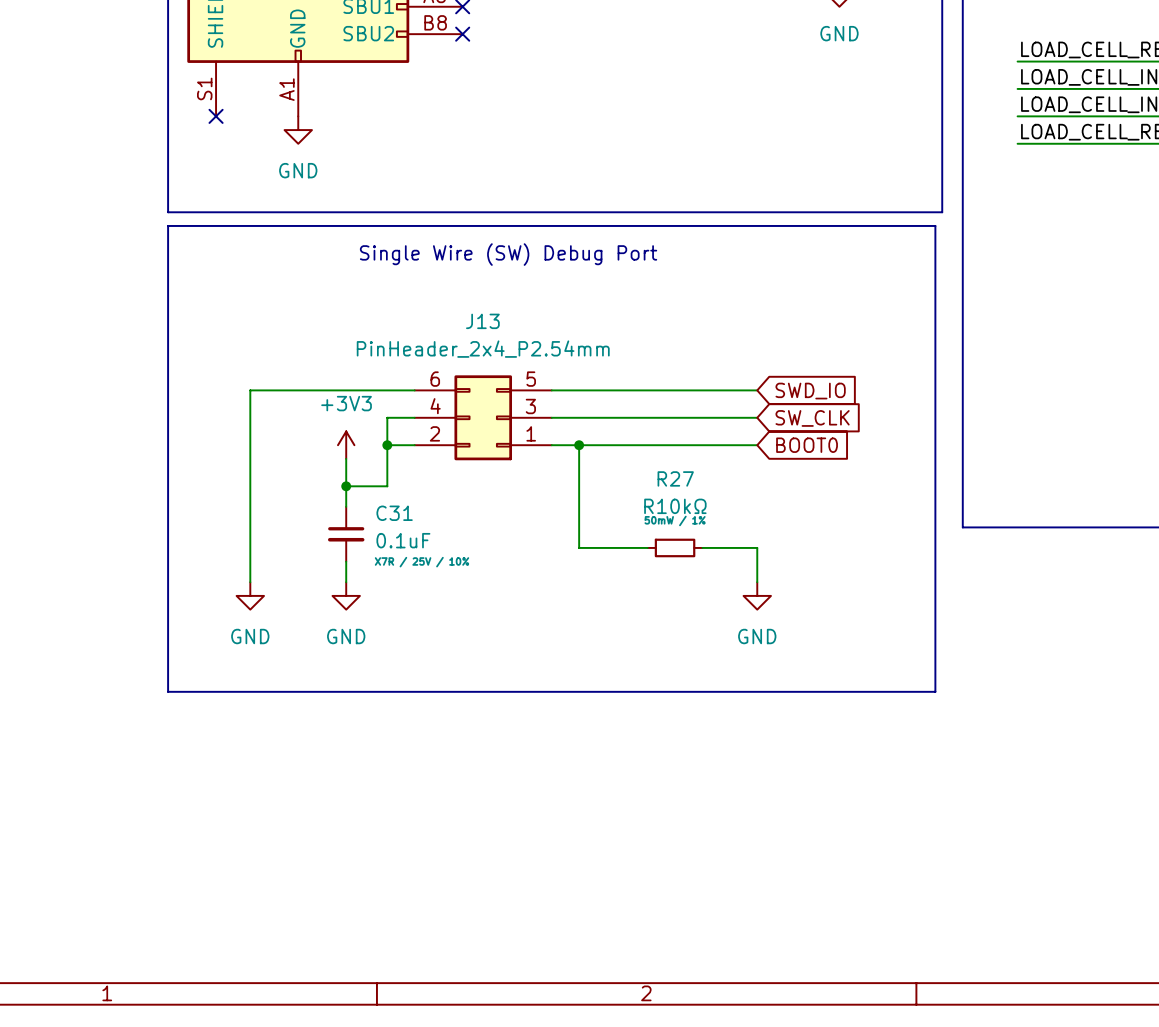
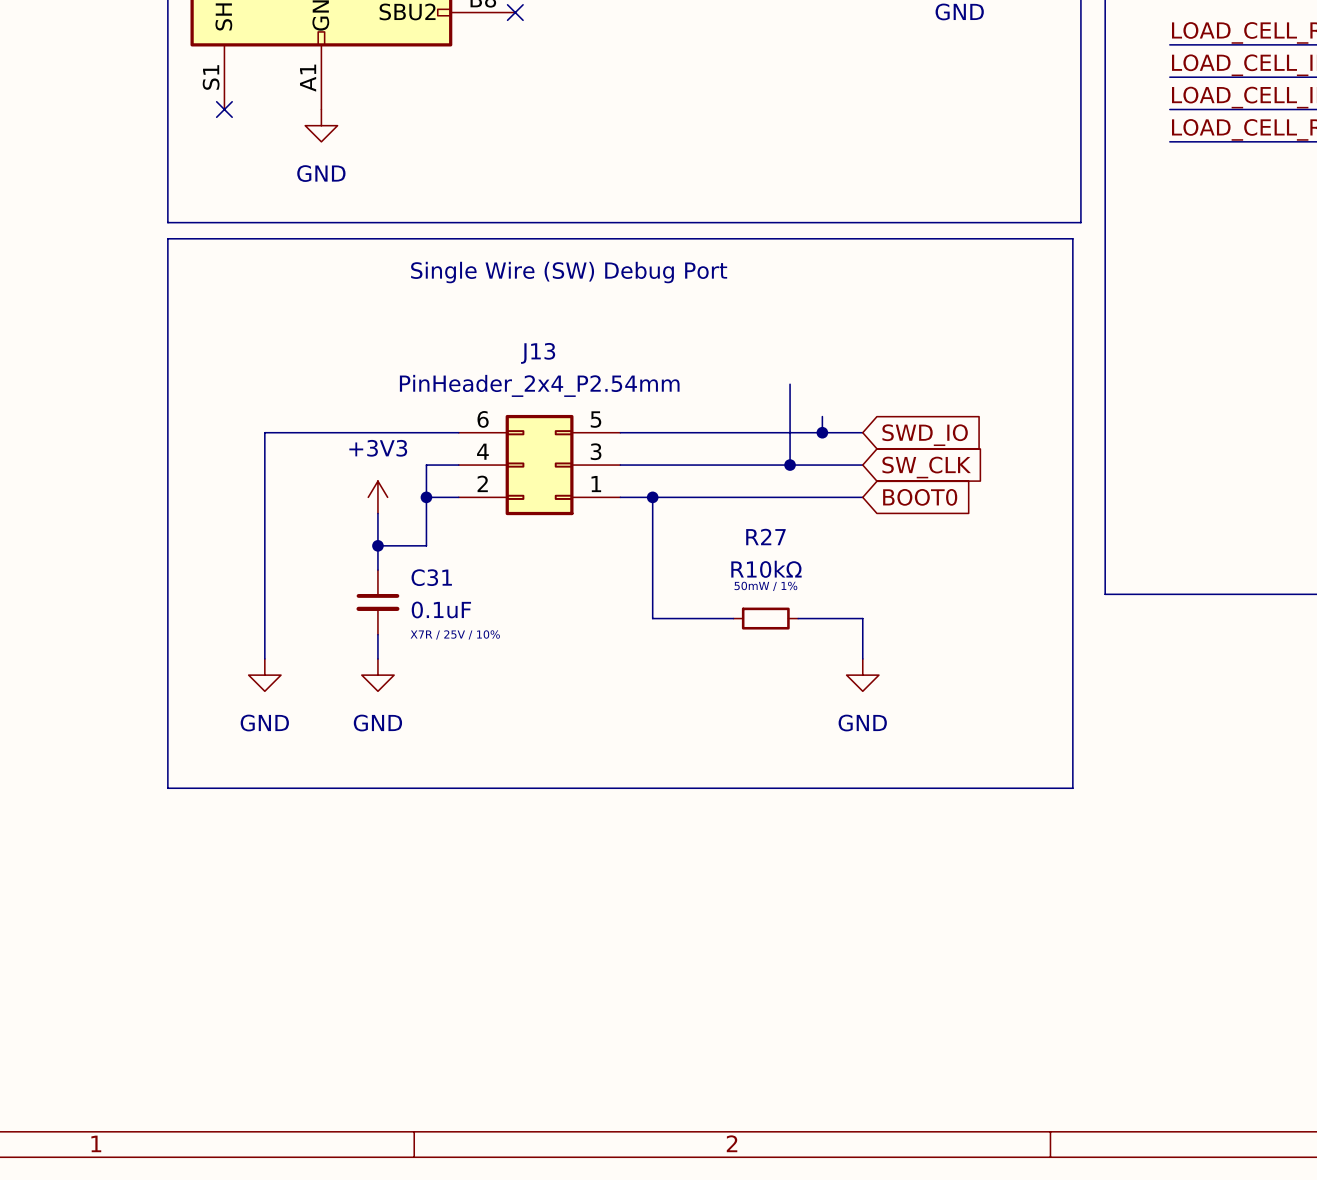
wire: none -> (790, 384) (790, 465)
wire: none -> (822, 416) (822, 432)
junction: none -> (822, 432)
junction: none -> (790, 465)

